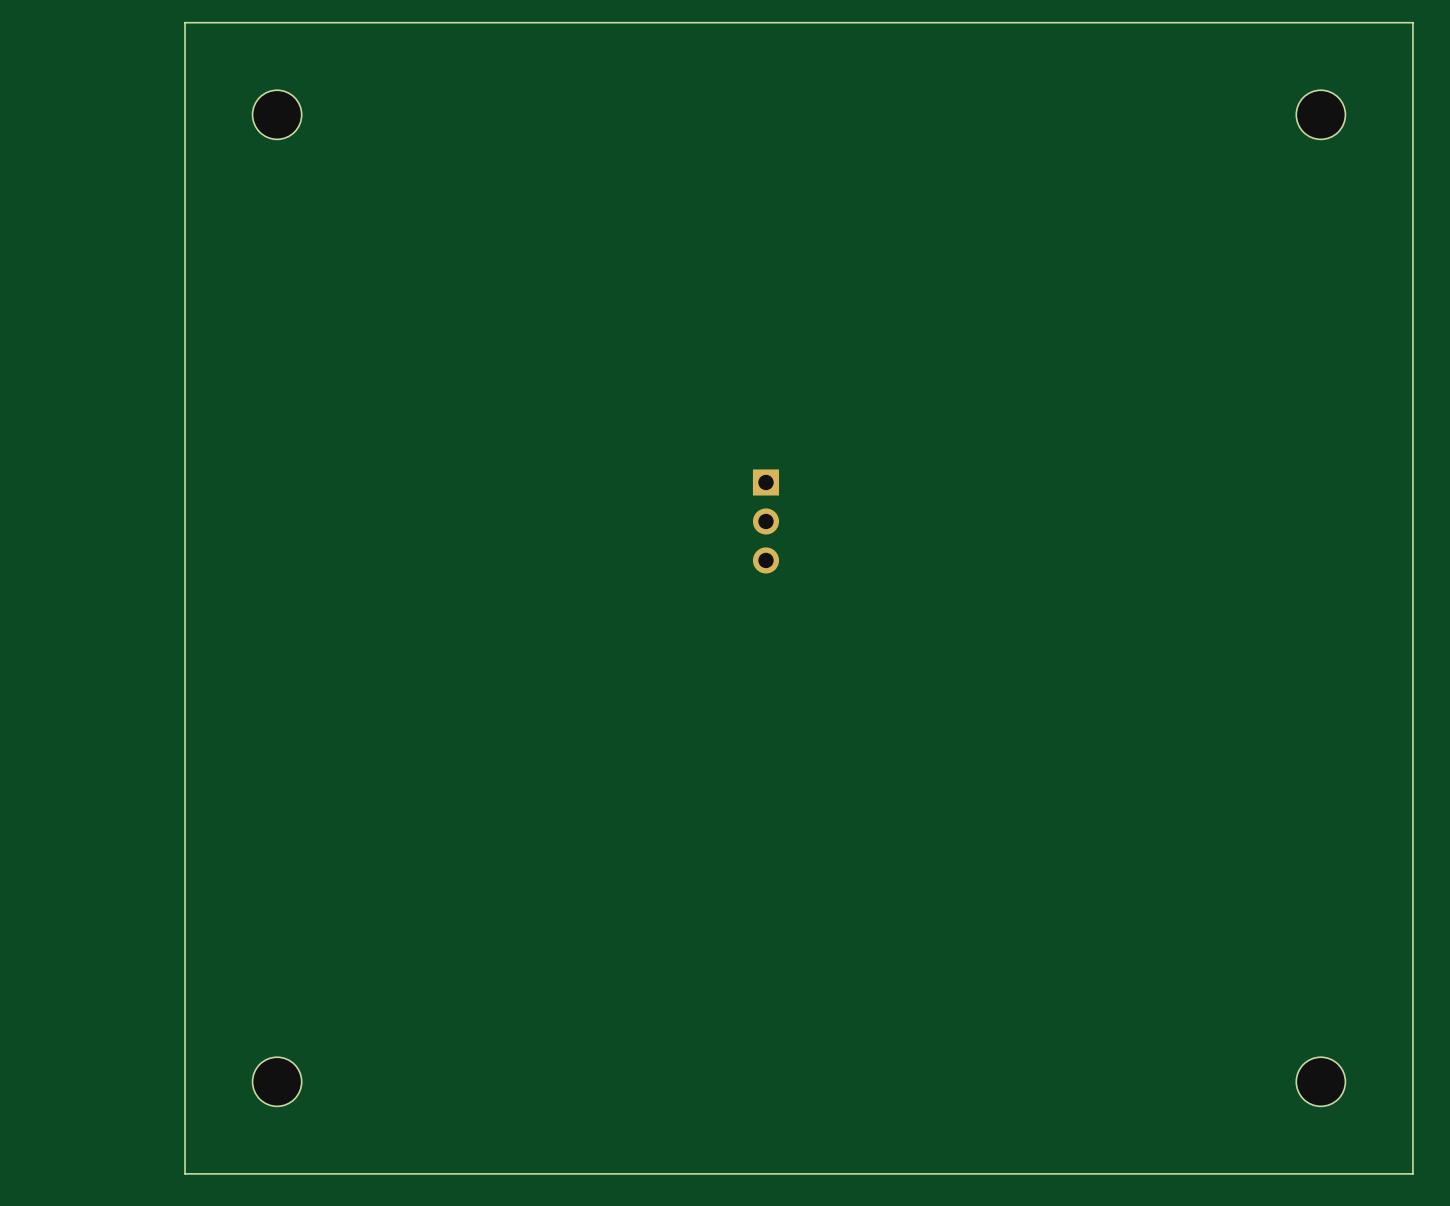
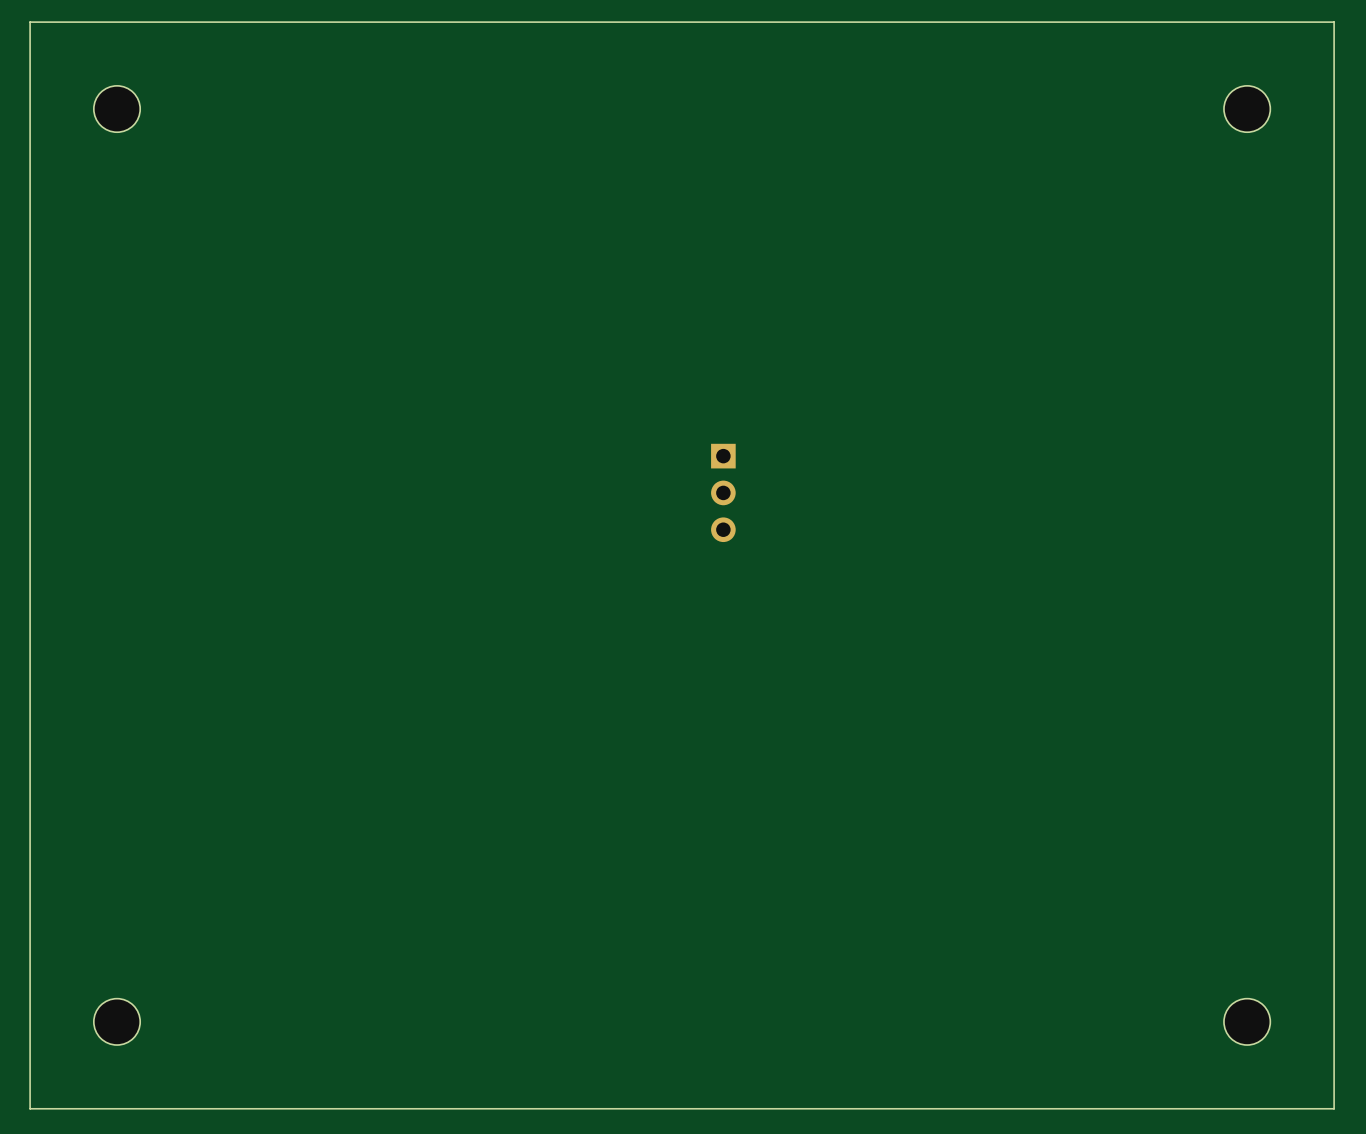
board edge: (185, 22) (185, 1173) -> (174, 22) (30, 22) (30, 1108) (174, 1108)
part position: (277, 114) -> (117, 109)
part position: (277, 1081) -> (117, 1021)

